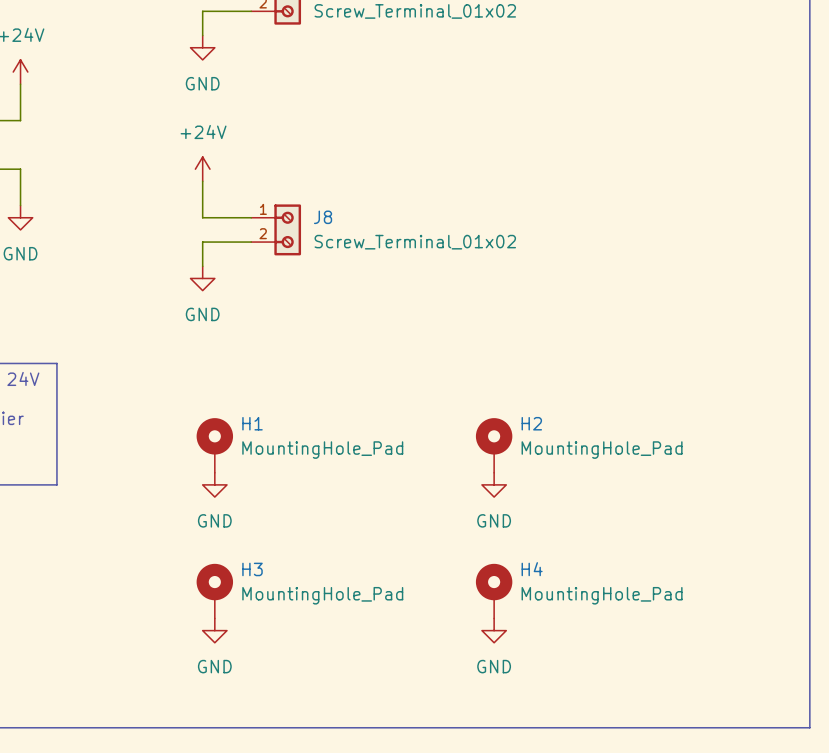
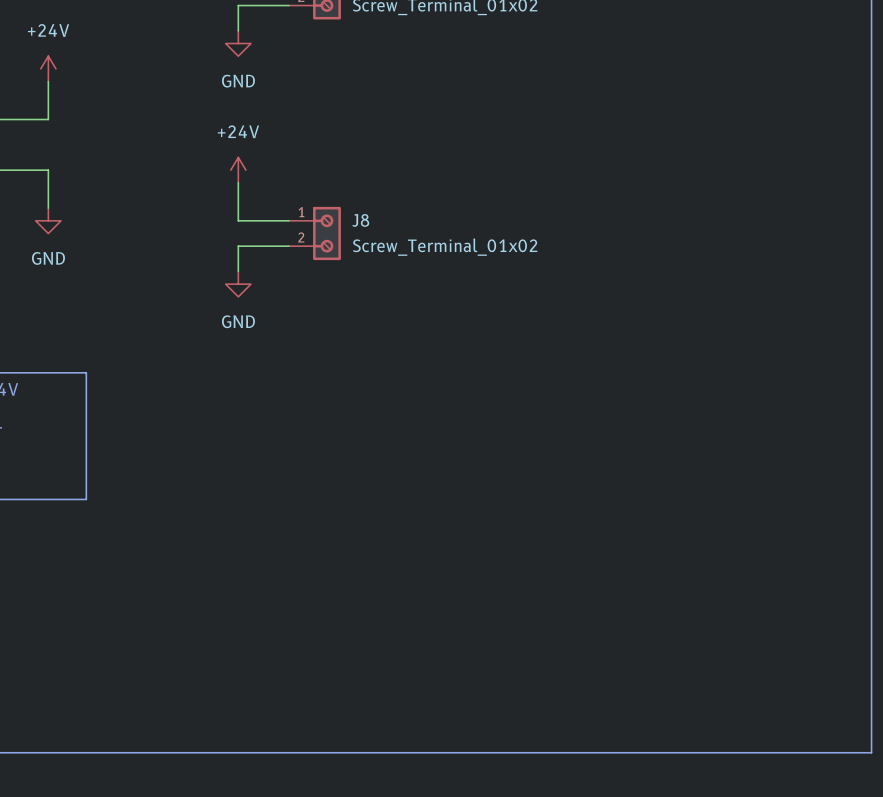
H1: MountingHole_Pad (214, 445) -> none
H2: MountingHole_Pad (494, 445) -> none
power symbol: GND (214, 484) -> none
power symbol: GND (494, 484) -> none
H3: MountingHole_Pad (214, 591) -> none
H4: MountingHole_Pad (494, 591) -> none
power symbol: GND (214, 630) -> none
power symbol: GND (494, 630) -> none

